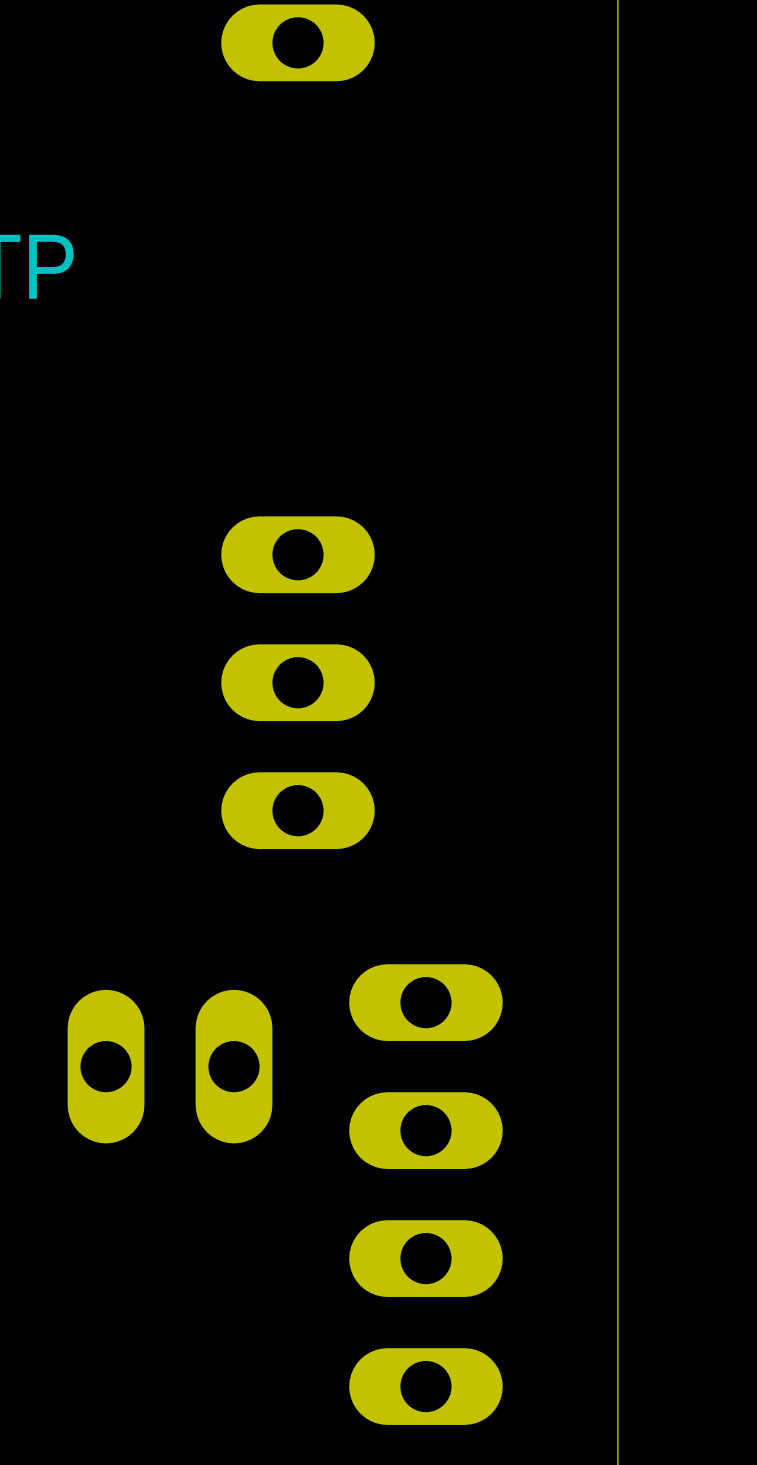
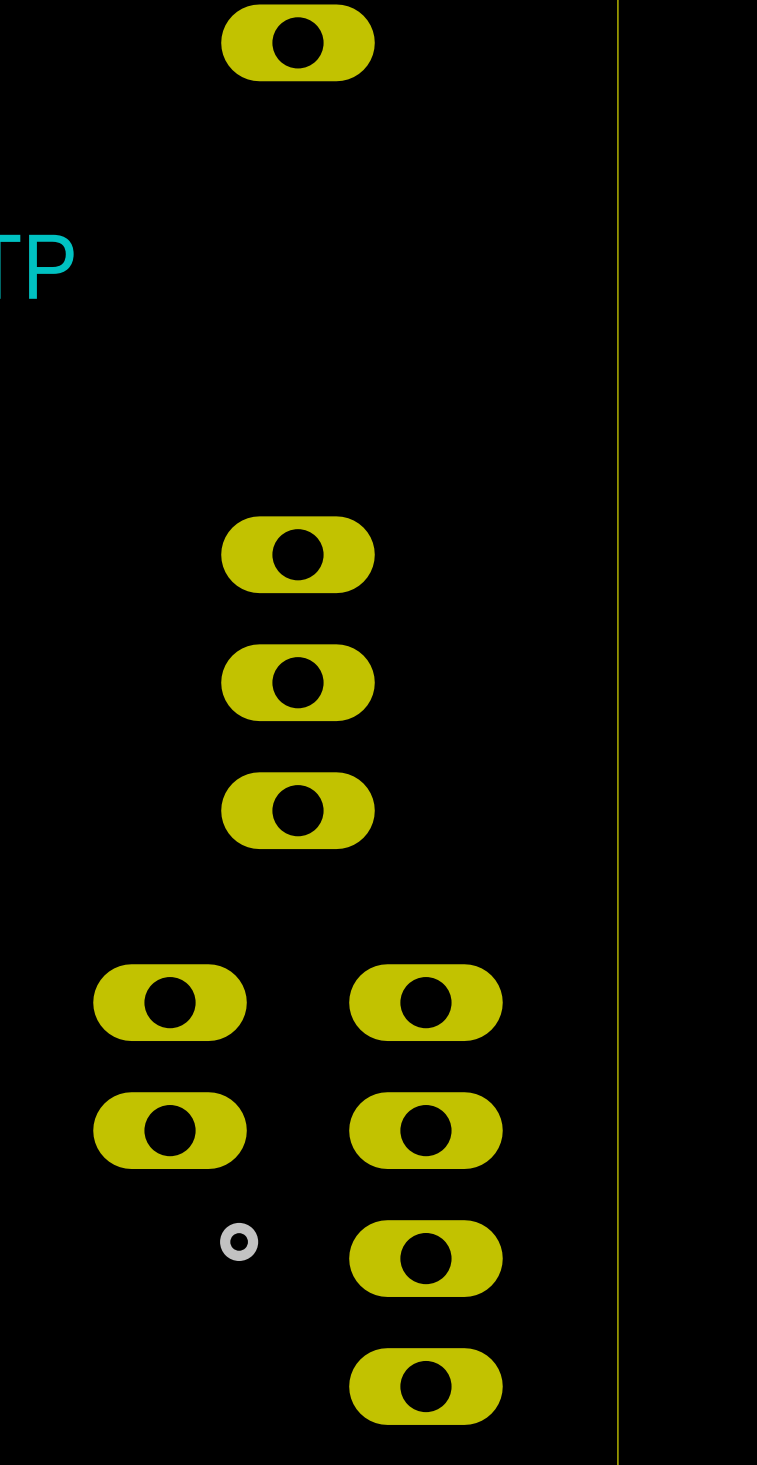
part rotation: 0° (170, 1066) -> 90° clockwise (170, 1066)
via: none -> (239, 1241)

